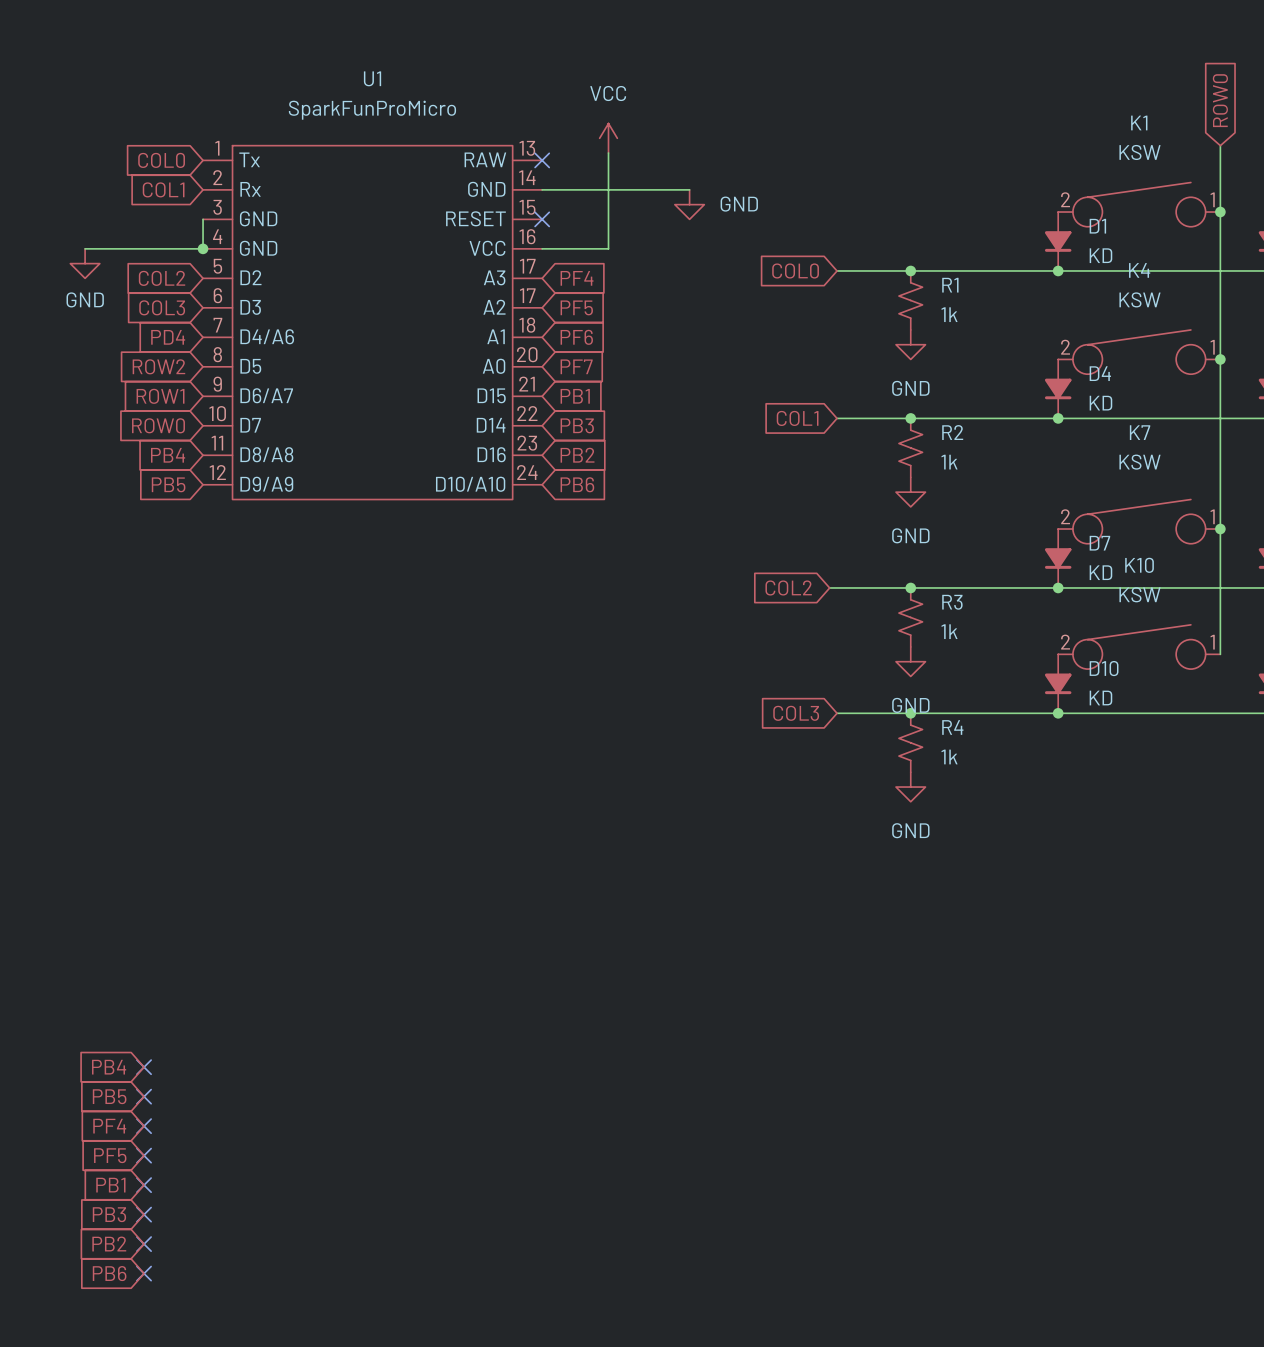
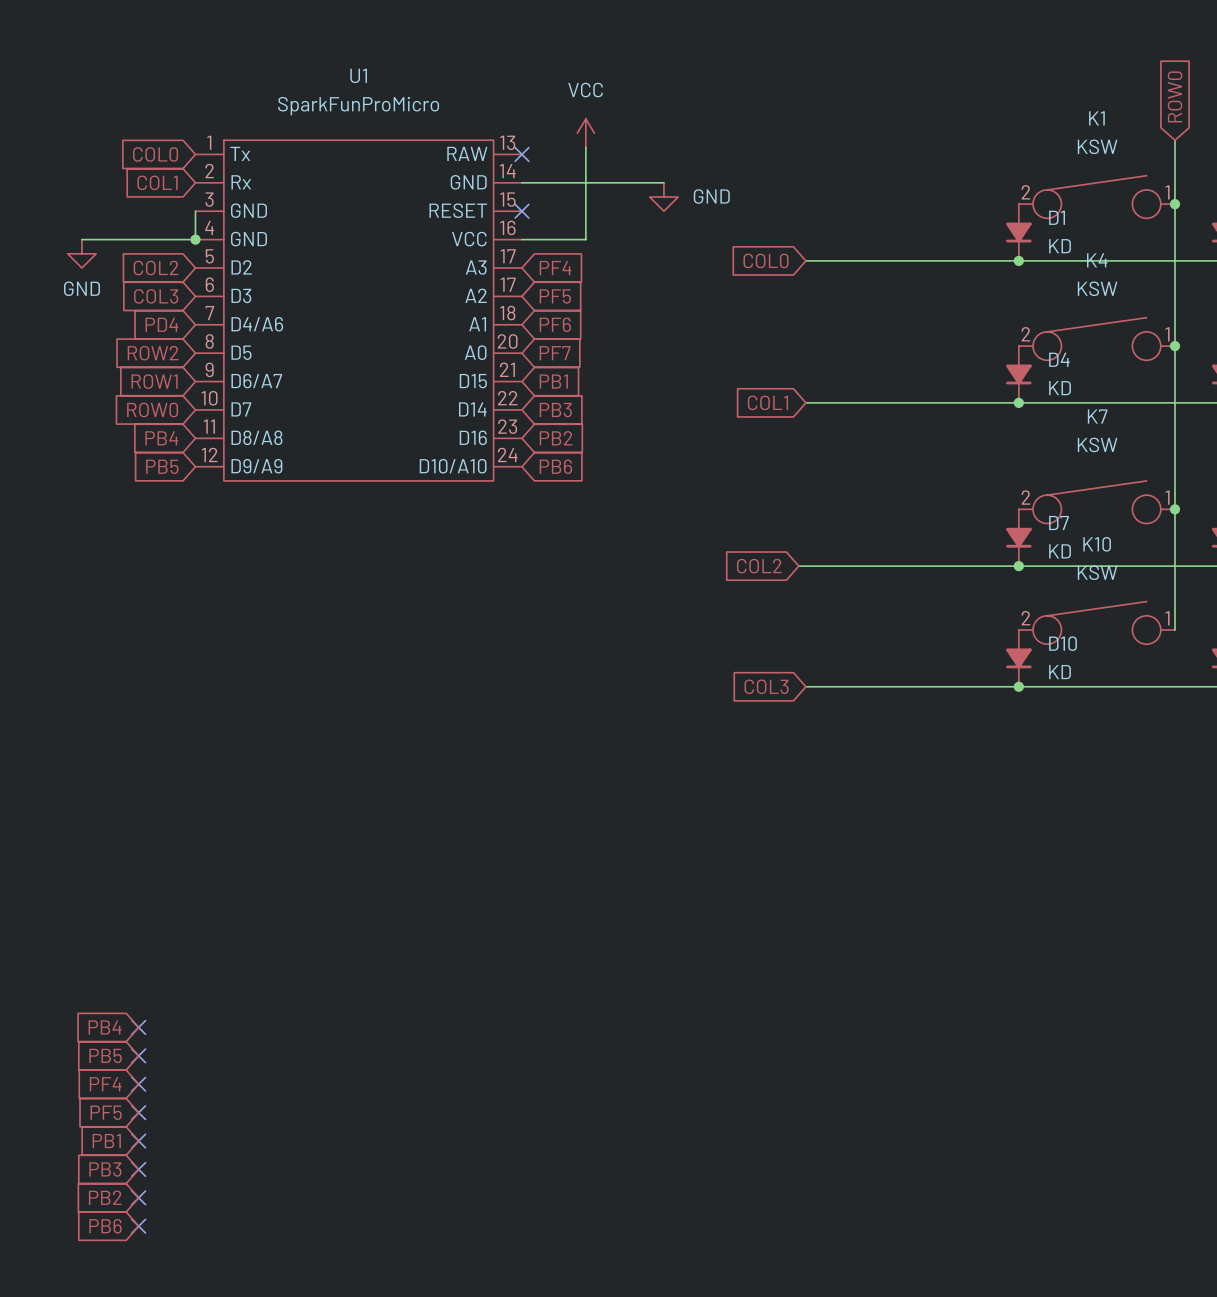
junction: (910, 270) -> none
R1: 1k (910, 300) -> none
power symbol: GND (910, 344) -> none
junction: (910, 418) -> none
R2: 1k (910, 447) -> none
power symbol: GND (910, 492) -> none
junction: (910, 587) -> none
R3: 1k (910, 617) -> none
power symbol: GND (910, 661) -> none
junction: (910, 713) -> none
R4: 1k (910, 742) -> none
power symbol: GND (910, 787) -> none

